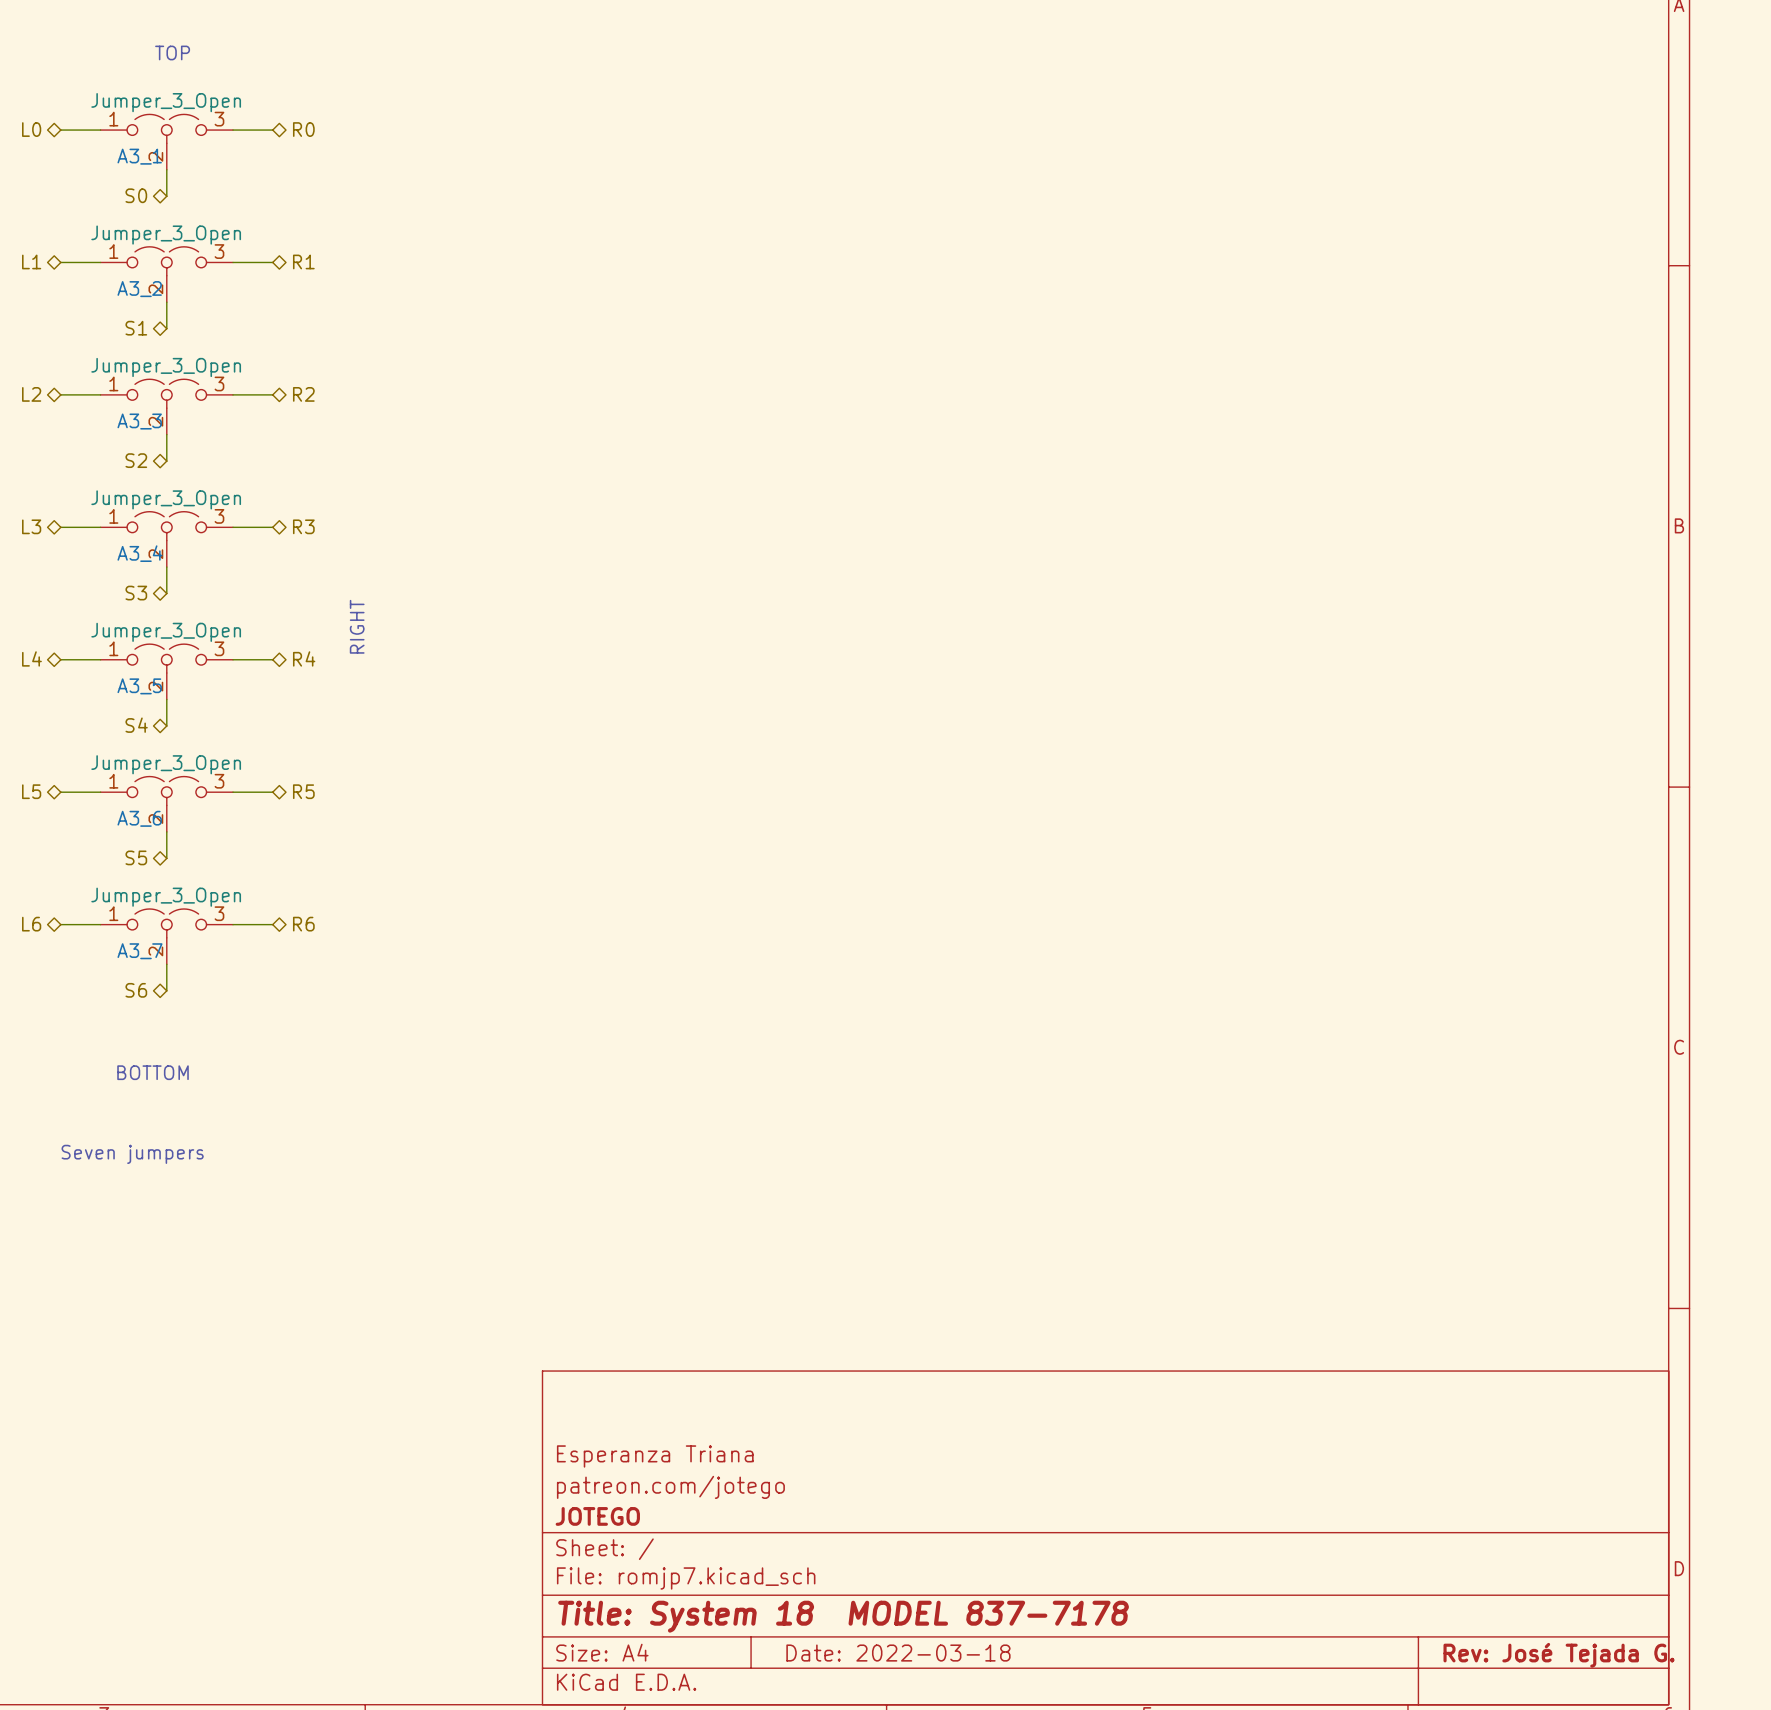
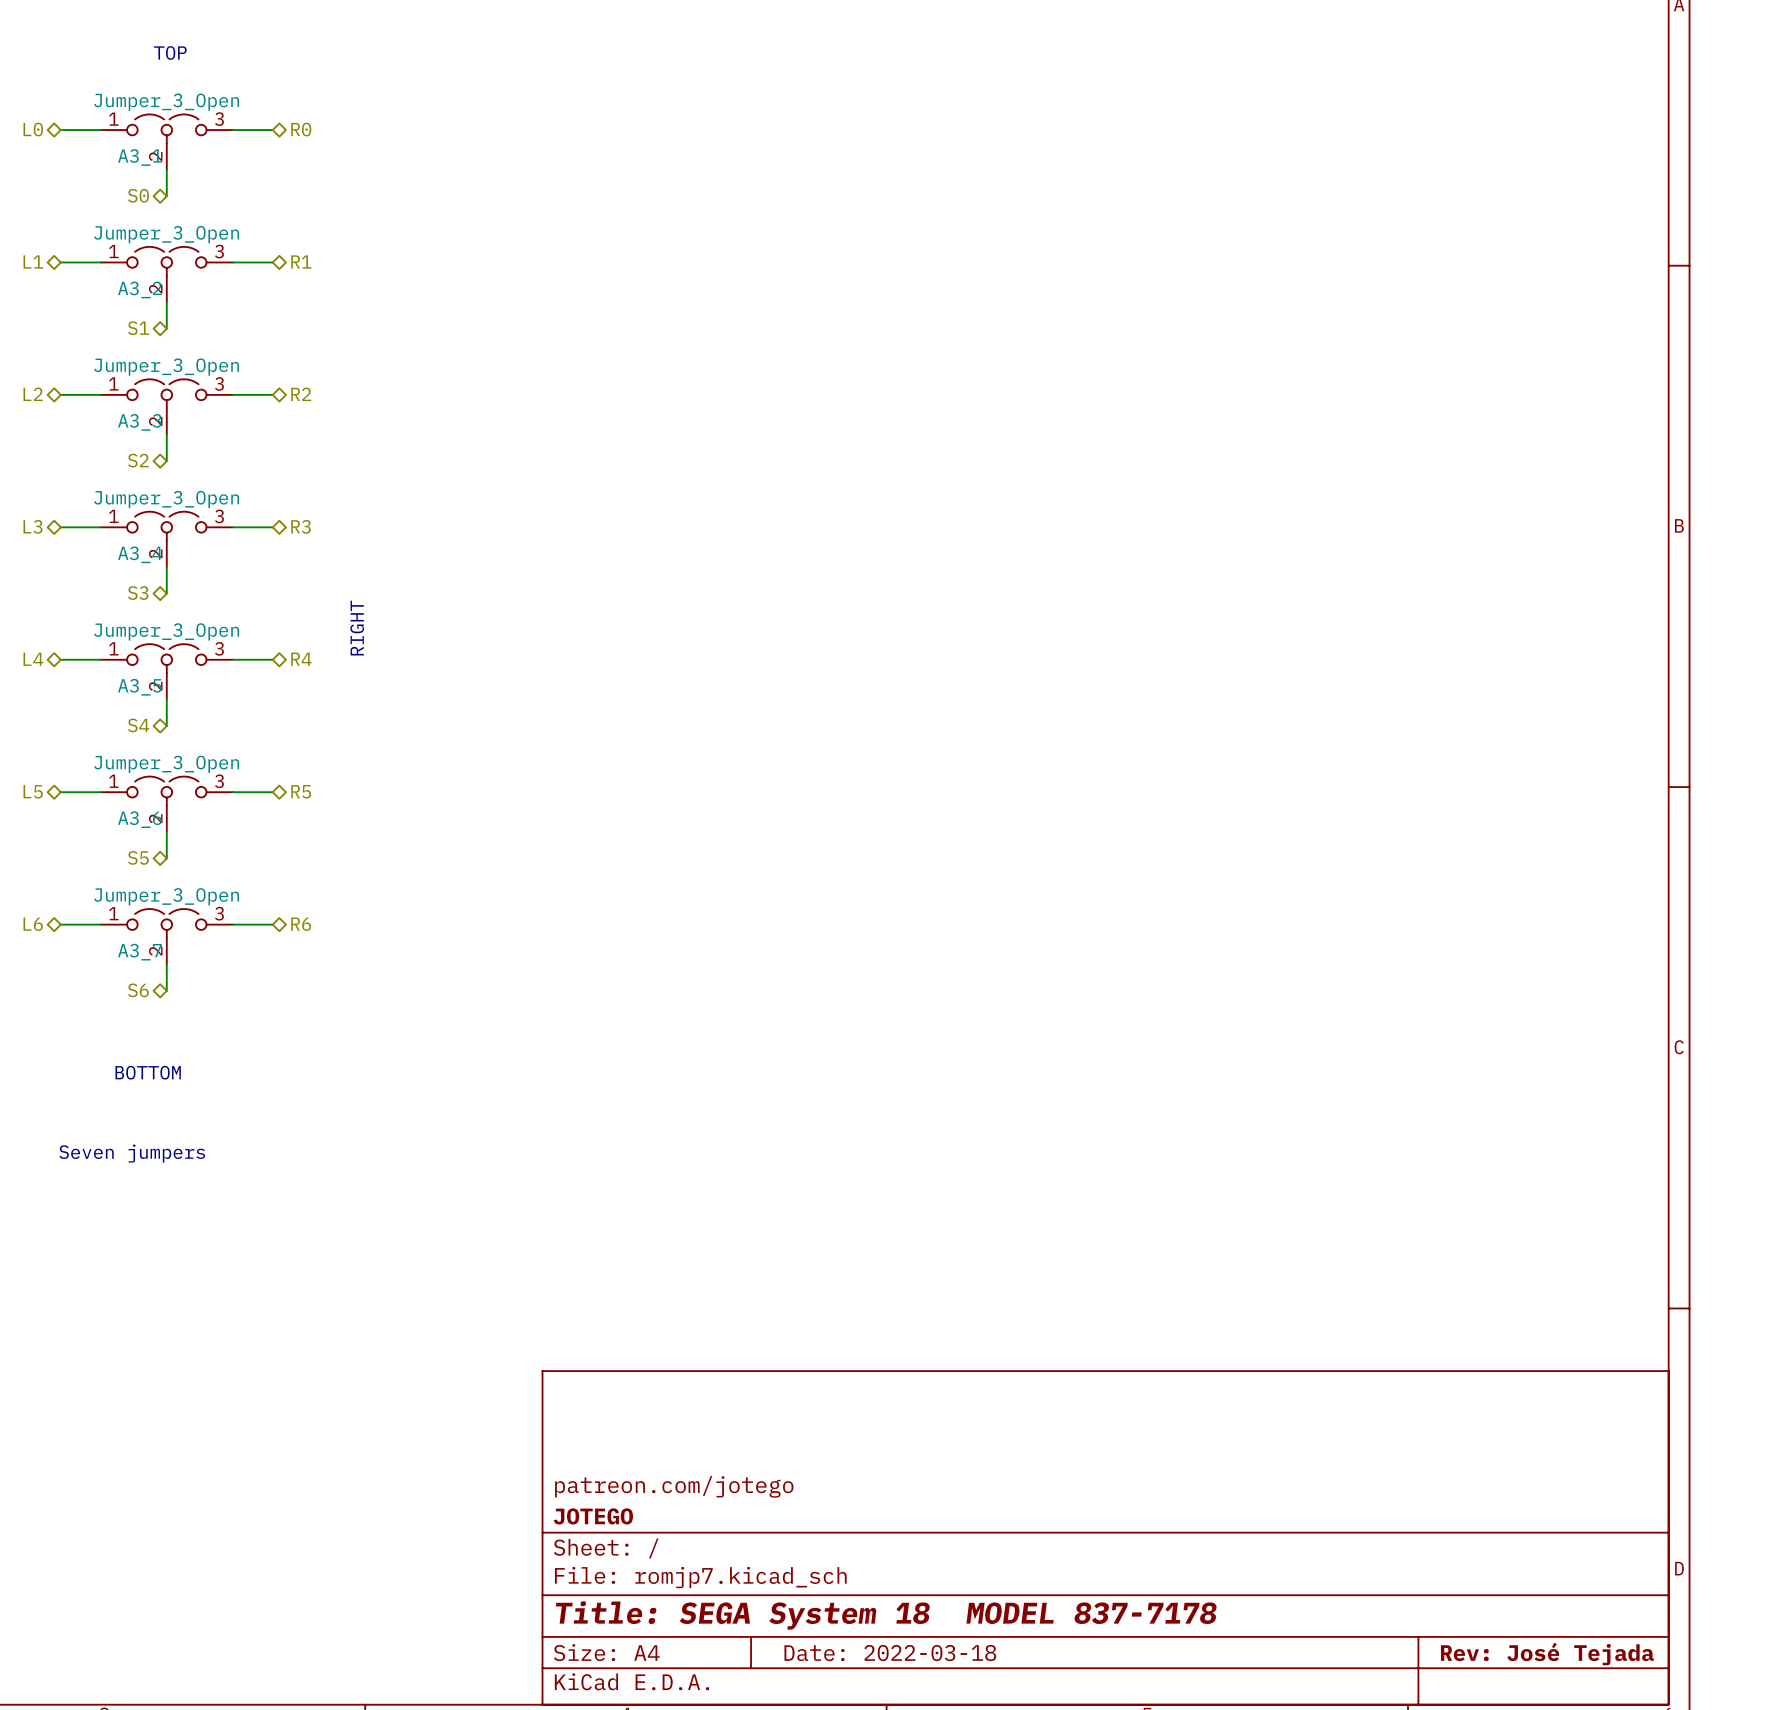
title block: Esperanza Triana (655, 1456) -> none
title block: Title: System 18 MODEL 837-7178 (843, 1616) -> Title: SEGA System 18 MODEL 837-7178 (886, 1615)
title block: Rev: José Tejada G. (1559, 1655) -> Rev: José Tejada (1547, 1654)

